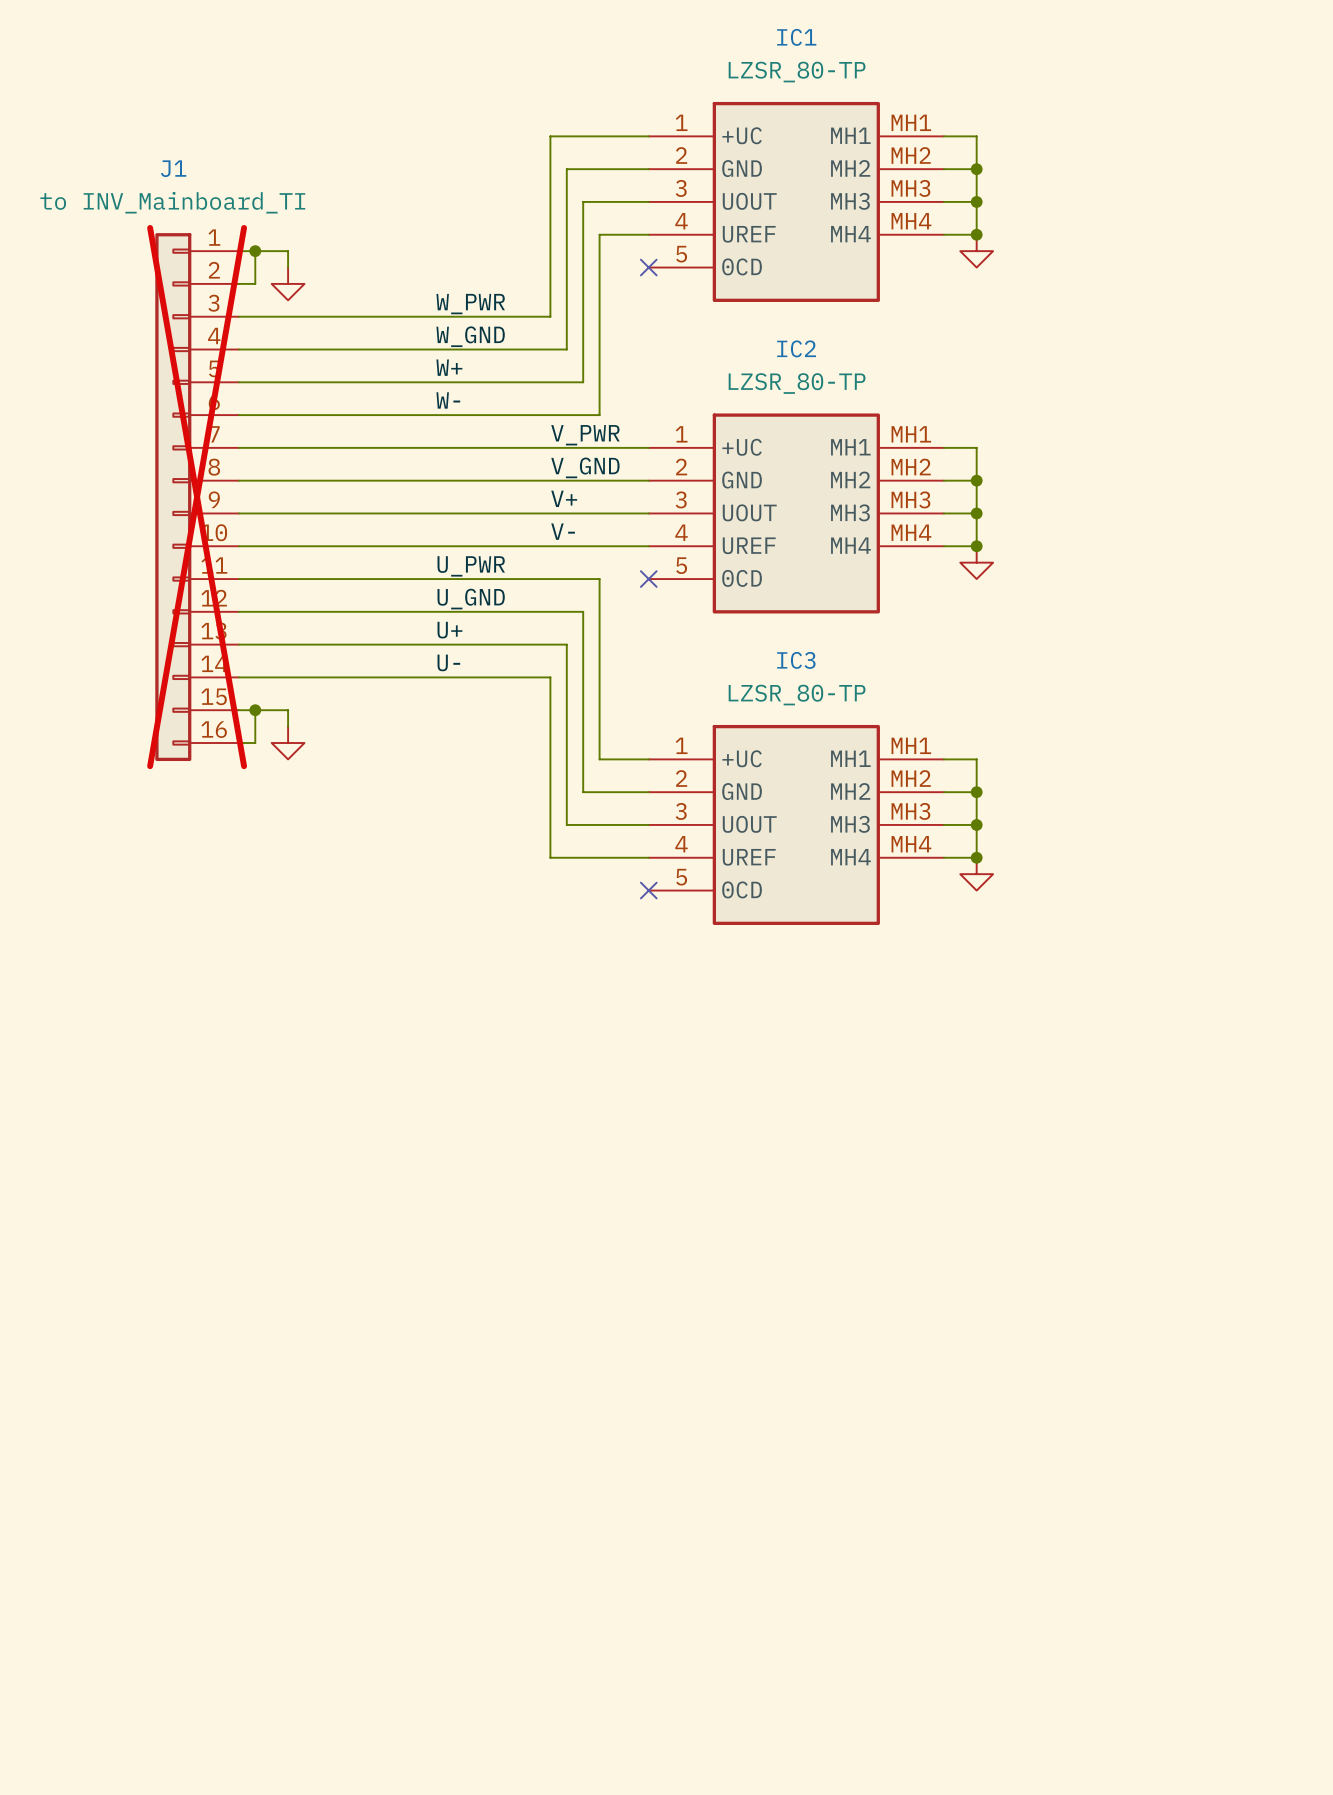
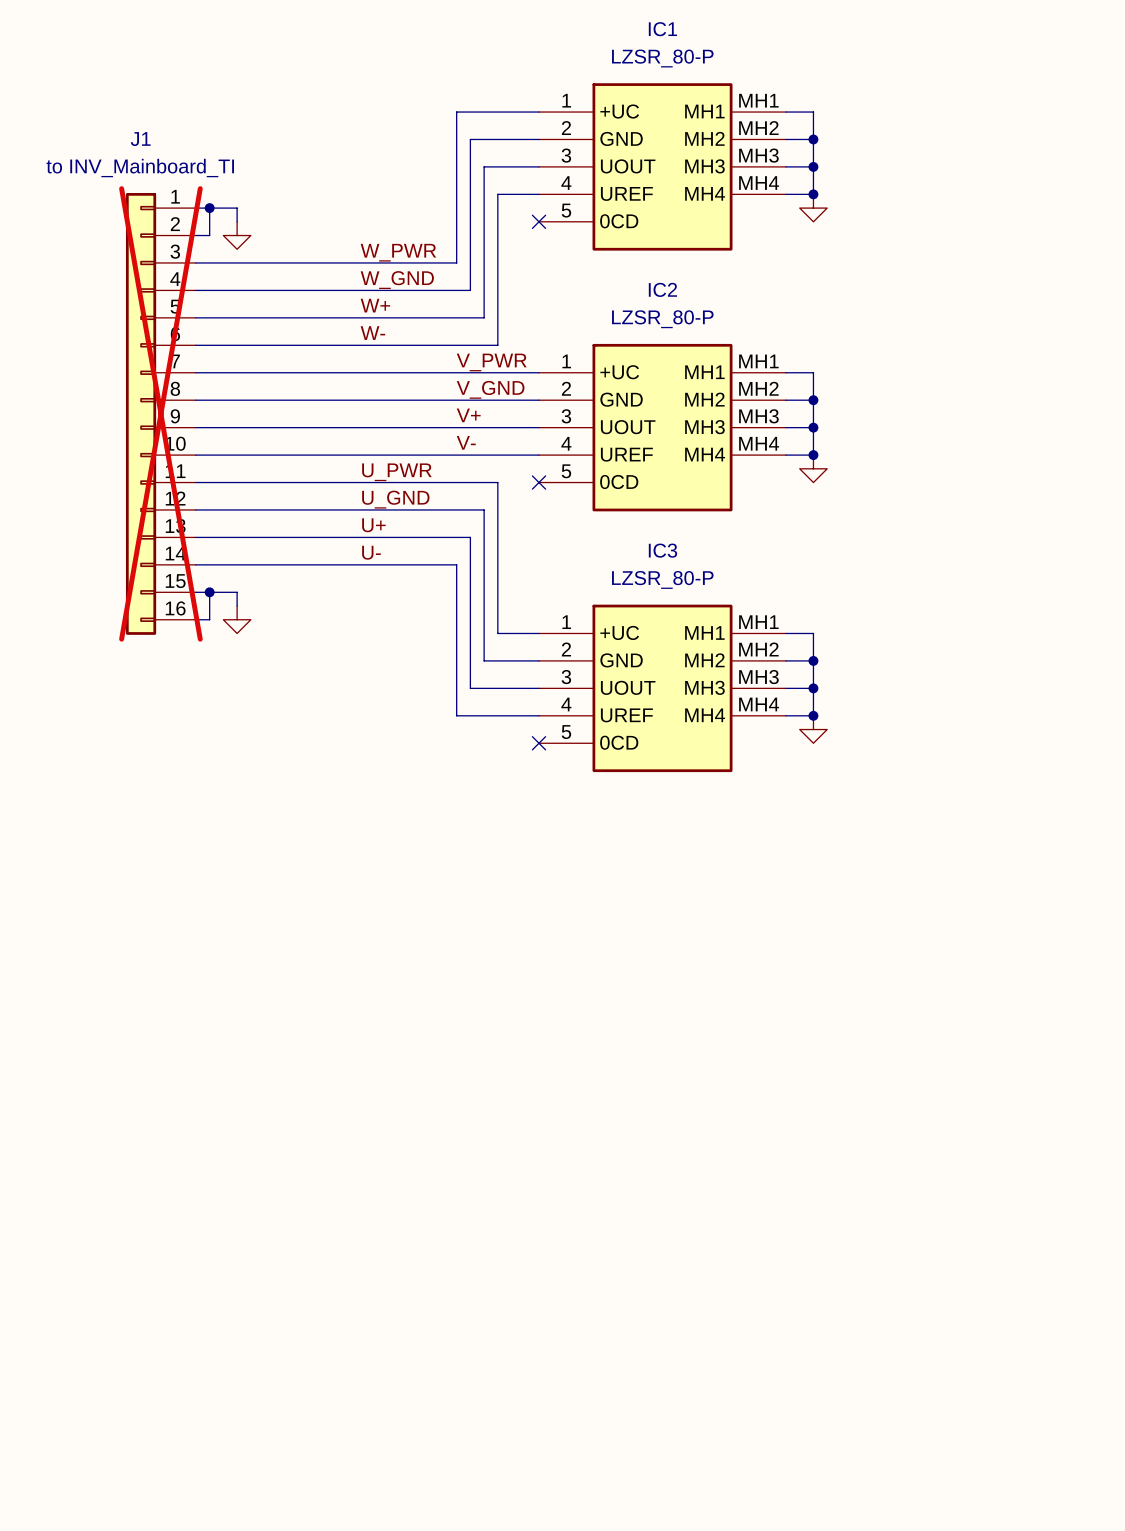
IC1 value: LZSR_80-TP (797, 72) -> LZSR_80-P (662, 58)
IC2 value: LZSR_80-TP (797, 383) -> LZSR_80-P (662, 319)
IC3 value: LZSR_80-TP (797, 695) -> LZSR_80-P (662, 579)

